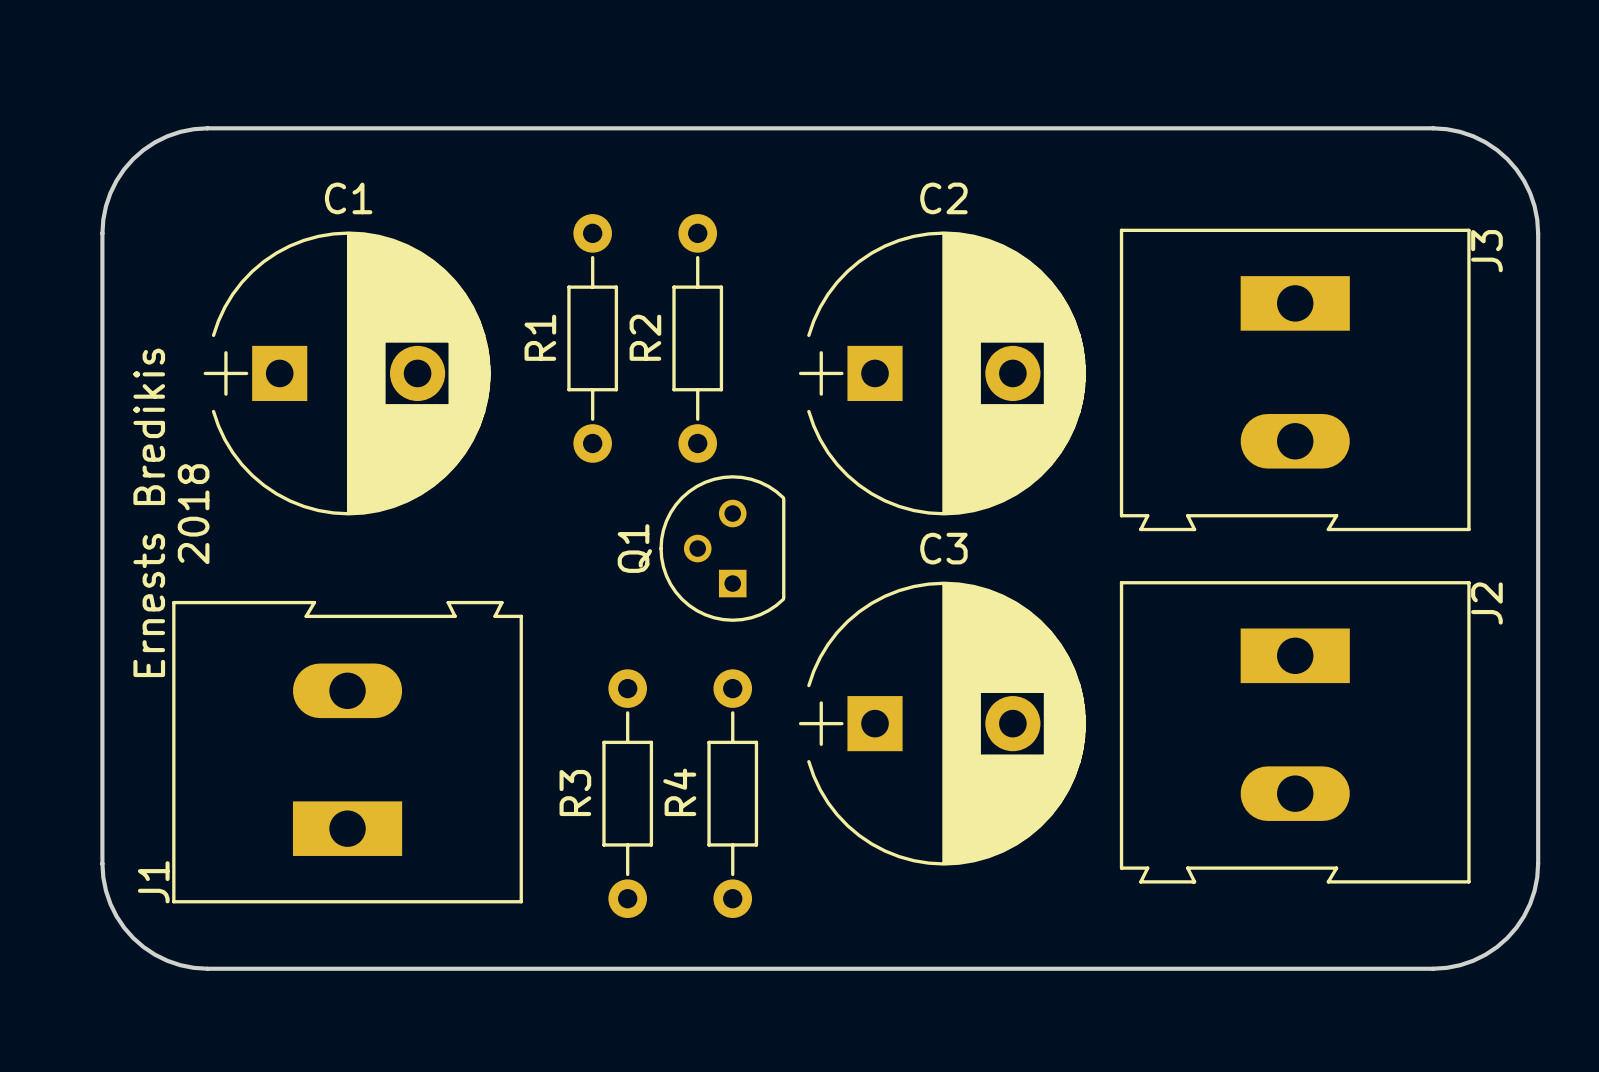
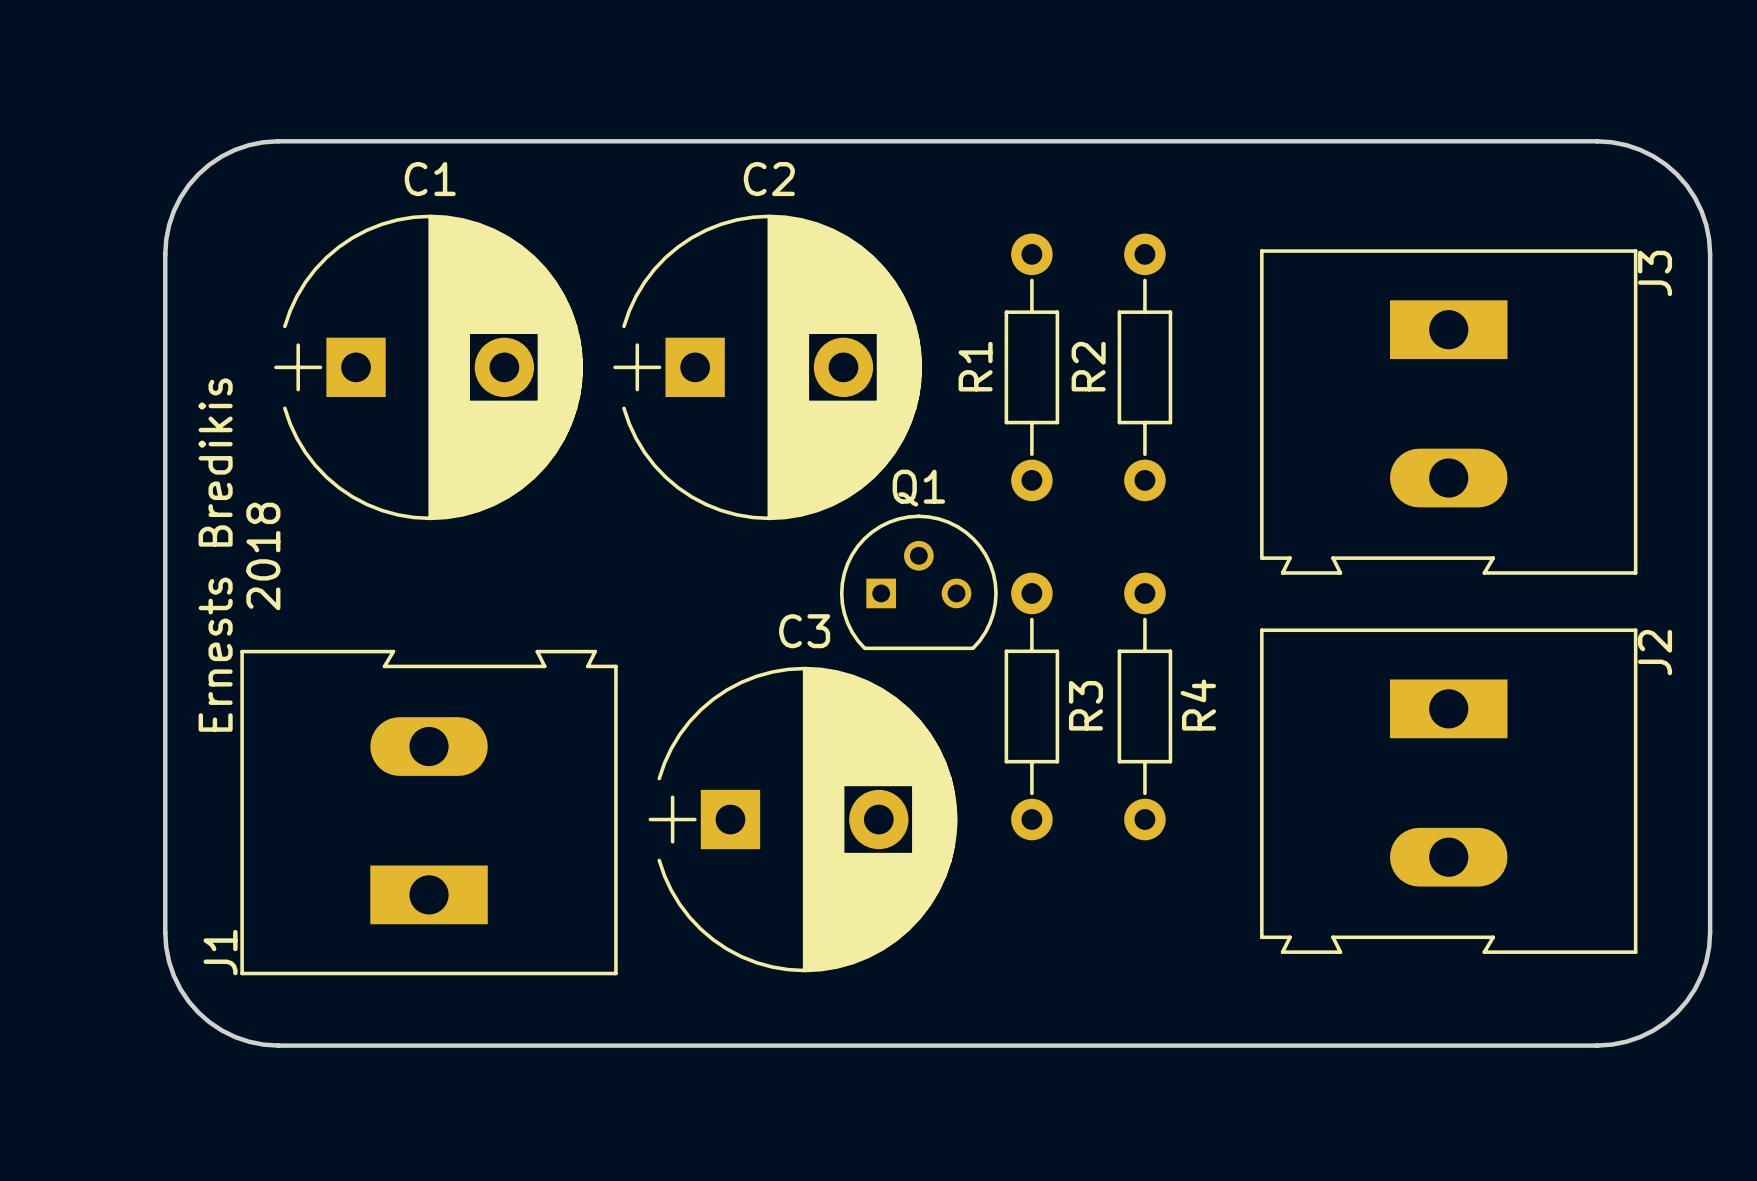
R1 position: (592, 338) -> (1031, 367)
R2 position: (697, 338) -> (1144, 367)
C1 position: (347, 373) -> (428, 367)
C2 position: (942, 373) -> (767, 367)
Q1 rotation: 0° (722, 548) -> 90° clockwise (918, 582)
C3 position: (942, 723) -> (803, 819)
R4 name position: R4 (679, 792) -> R4 (1198, 705)
R3 name position: R3 (575, 793) -> R3 (1085, 705)
R3 position: (627, 793) -> (1031, 706)
R4 position: (732, 793) -> (1144, 706)

